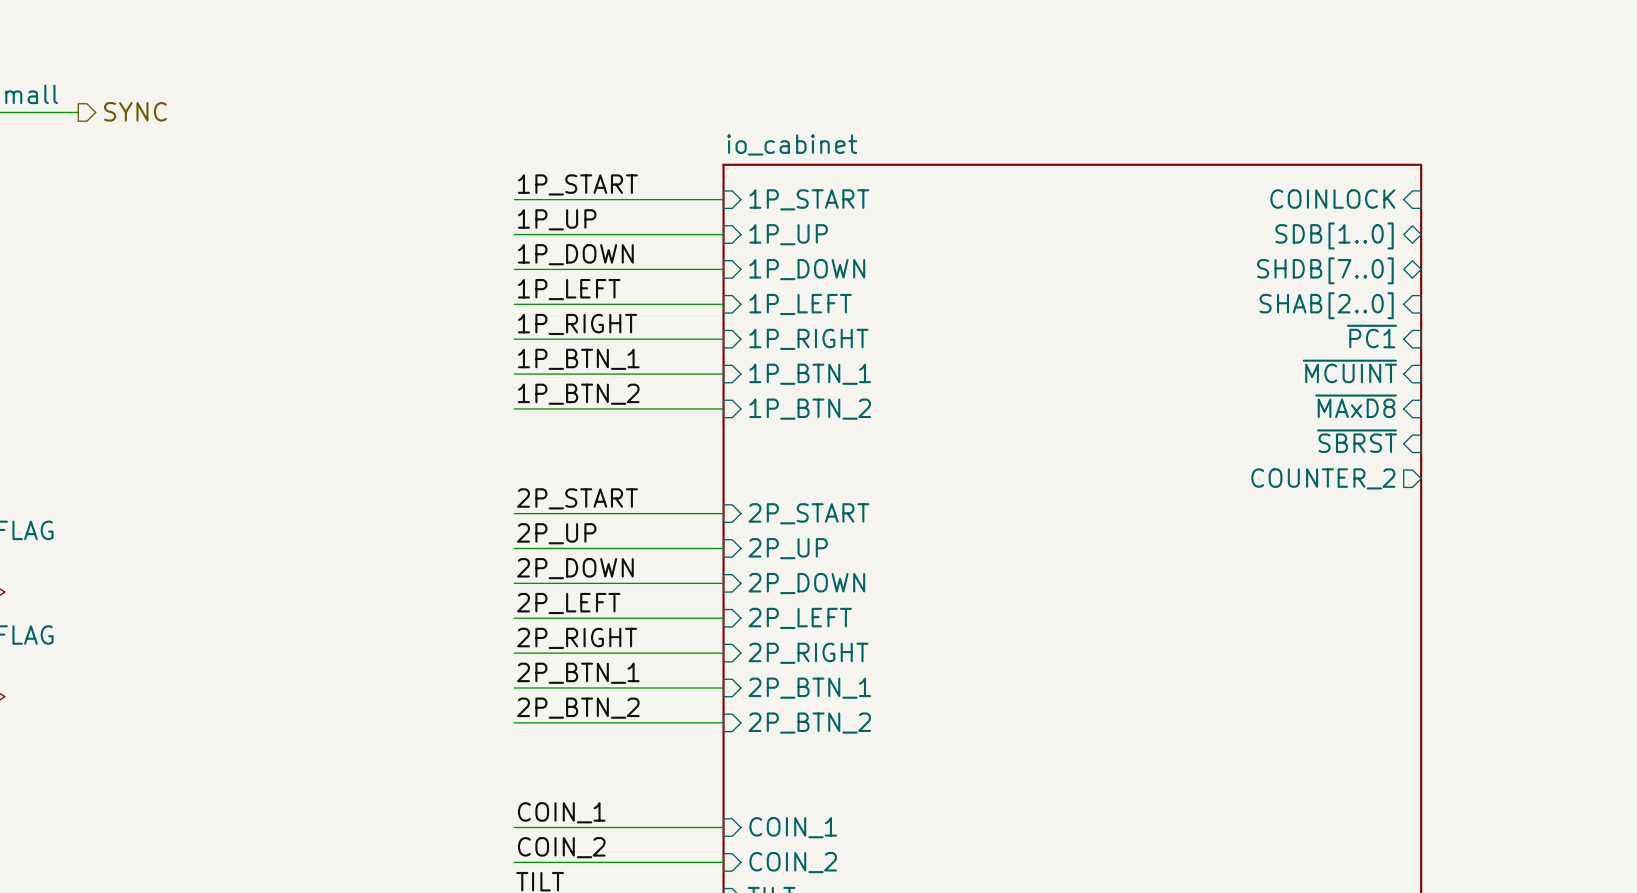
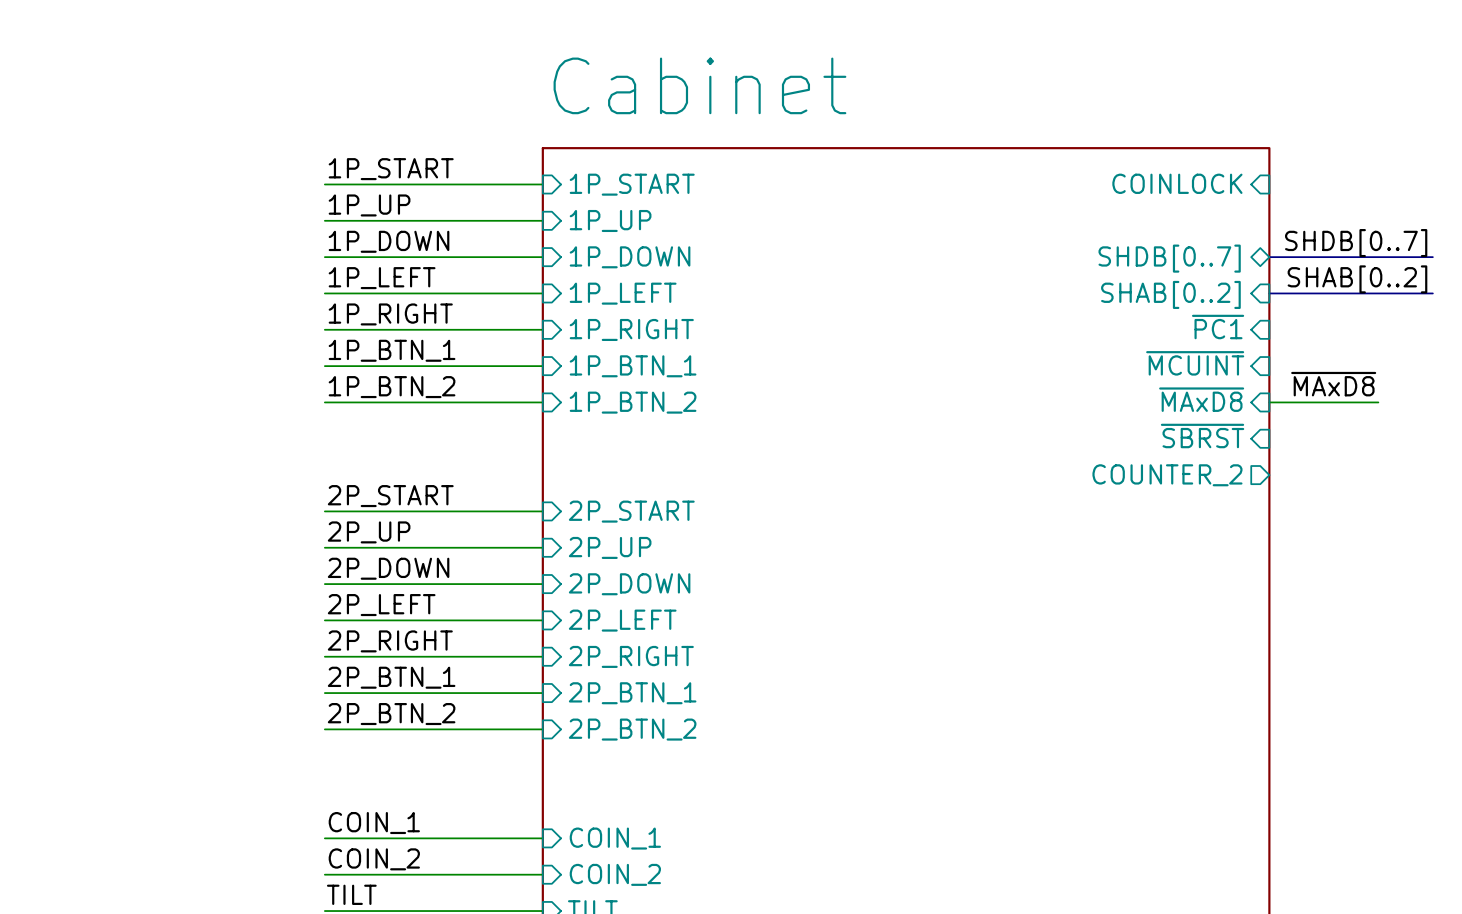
sheet io_cabinet name: io_cabinet (792, 144) -> Cabinet (699, 85)
sheet pin: SDB[1..0] (1334, 235) -> none
label: none -> SHDB[0..7] (1356, 243)
bus: none -> (1269, 257) (1432, 257)
sheet pin: SHDB[7..0] (1325, 270) -> SHDB[0..7] (1169, 258)
label: none -> SHAB[0..2] (1357, 279)
bus: none -> (1269, 293) (1432, 293)
sheet pin: SHAB[2..0] (1326, 305) -> SHAB[0..2] (1170, 294)
label: none -> ~{MAxD8} (1333, 384)
wire: none -> (1269, 402) (1378, 402)

